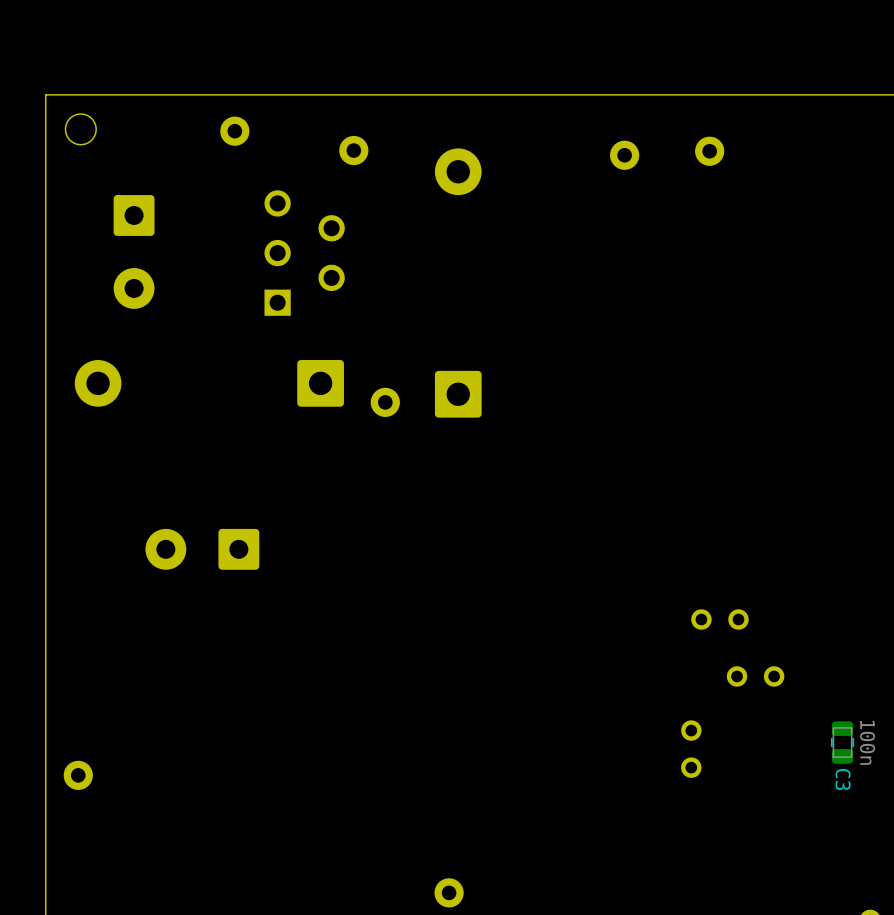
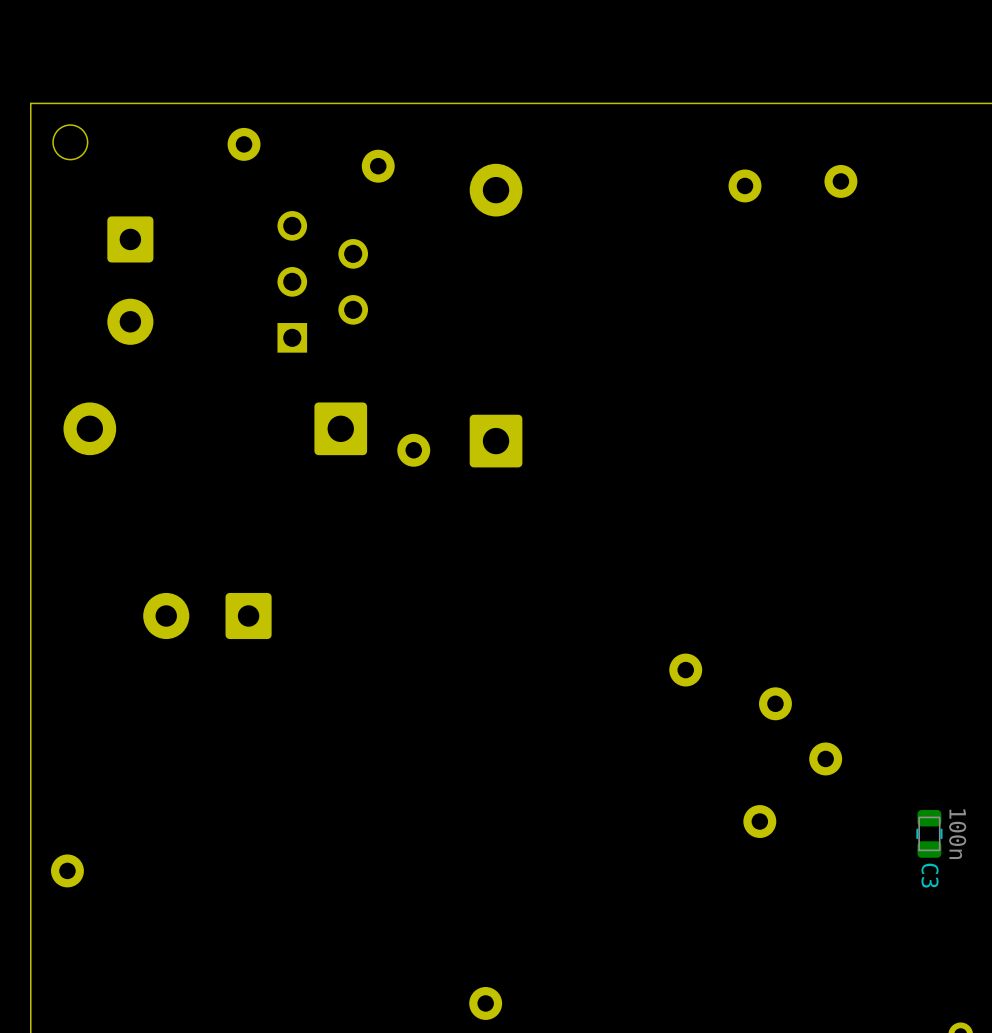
part: (709, 151) -> none
part: (624, 155) -> none
part: none -> (840, 181)
part: none -> (745, 185)
part: none -> (685, 670)
part: (719, 619) -> none
part: none -> (775, 703)
part footprint: [726, 666, 785, 687] -> [809, 742, 843, 776]
part: none -> (759, 821)
part: (691, 749) -> none

